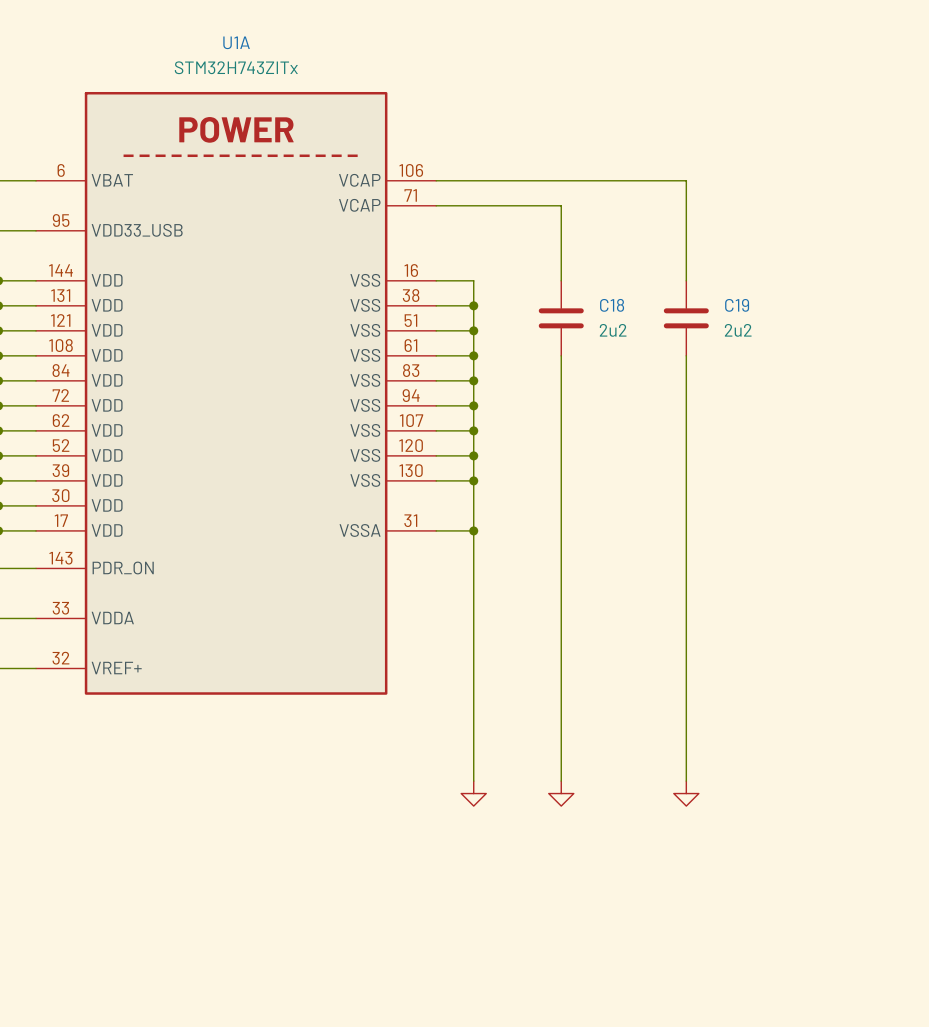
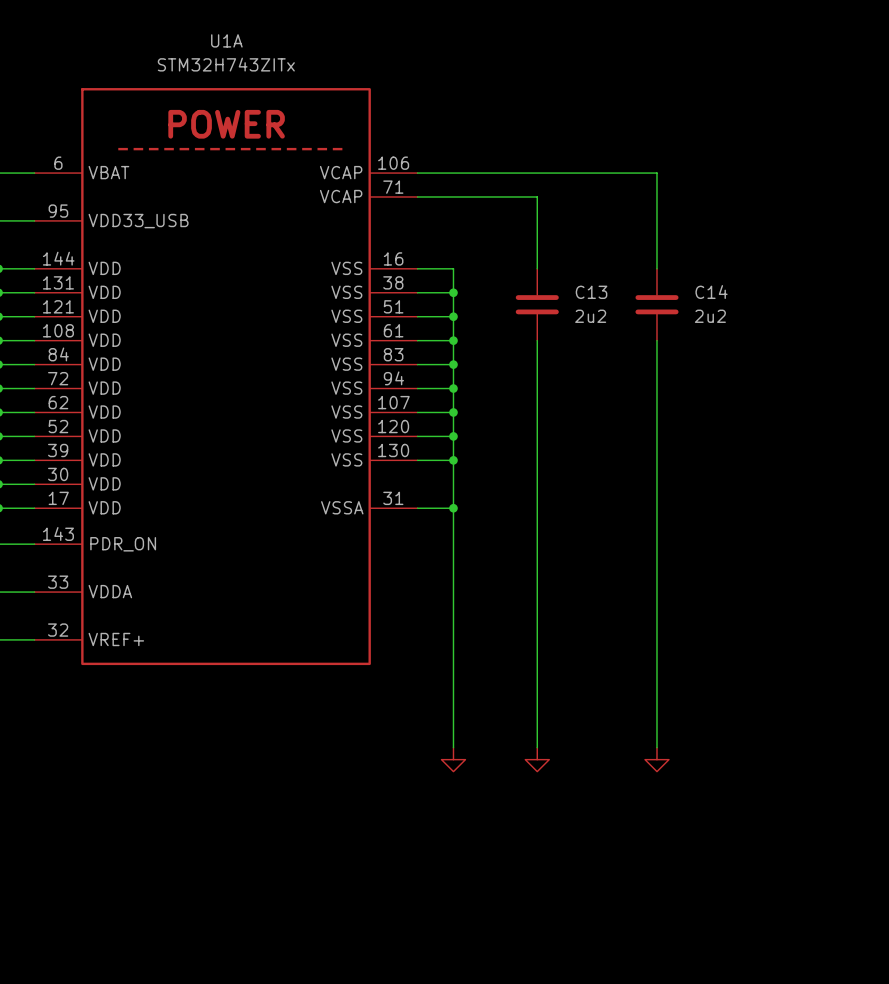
C18 name: C18 (612, 305) -> C13 (591, 292)
C19 name: C19 (737, 305) -> C14 (711, 292)

